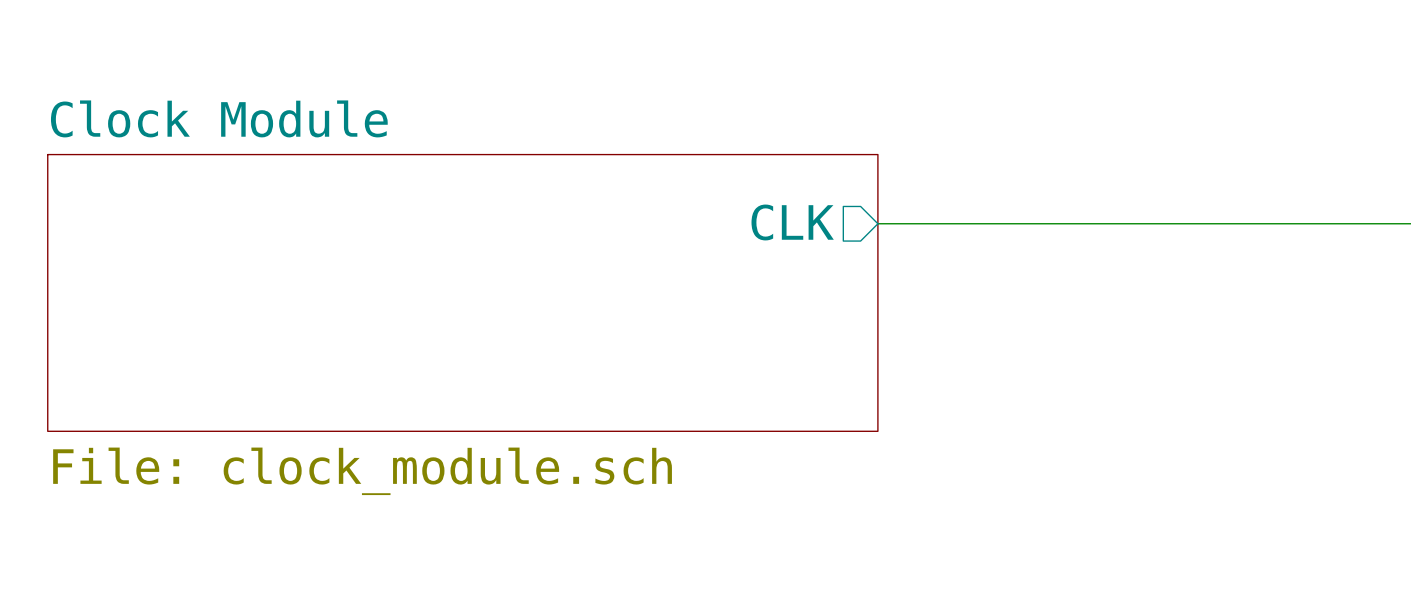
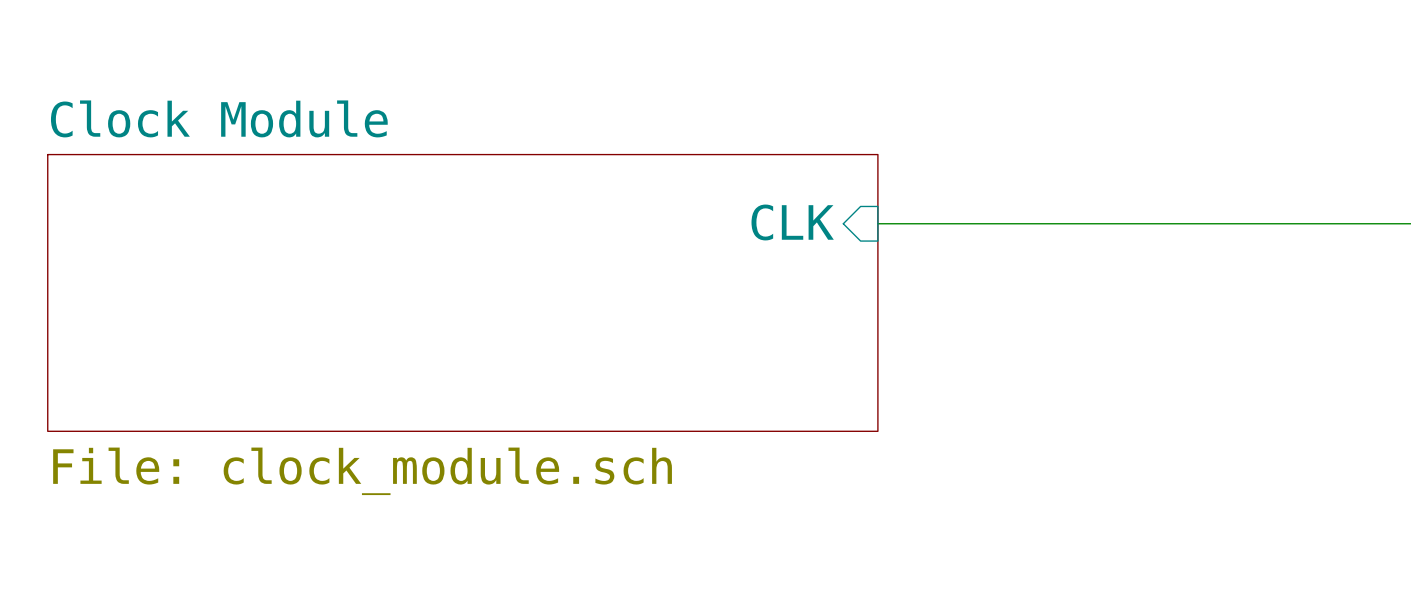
sheet pin shape: output (792, 222) -> input (792, 222)

